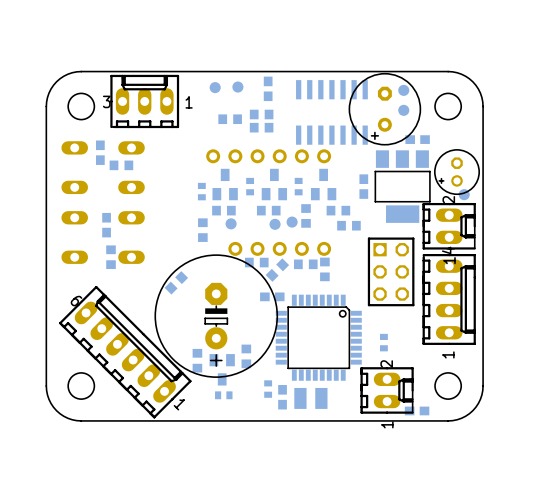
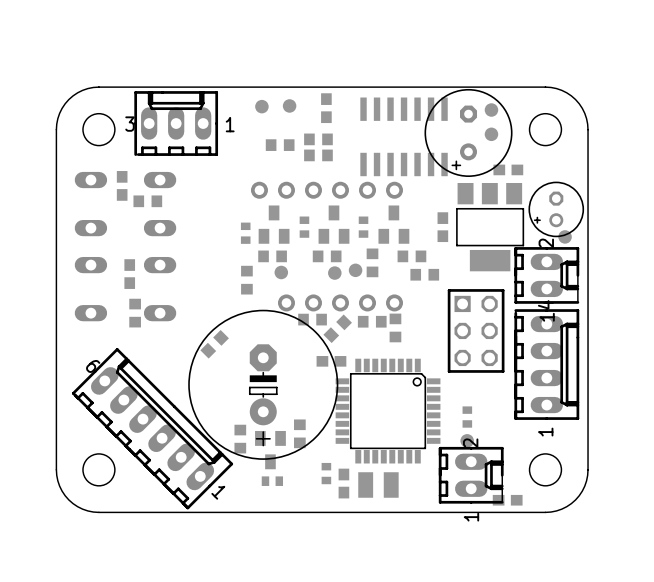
part: none -> (467, 440)

